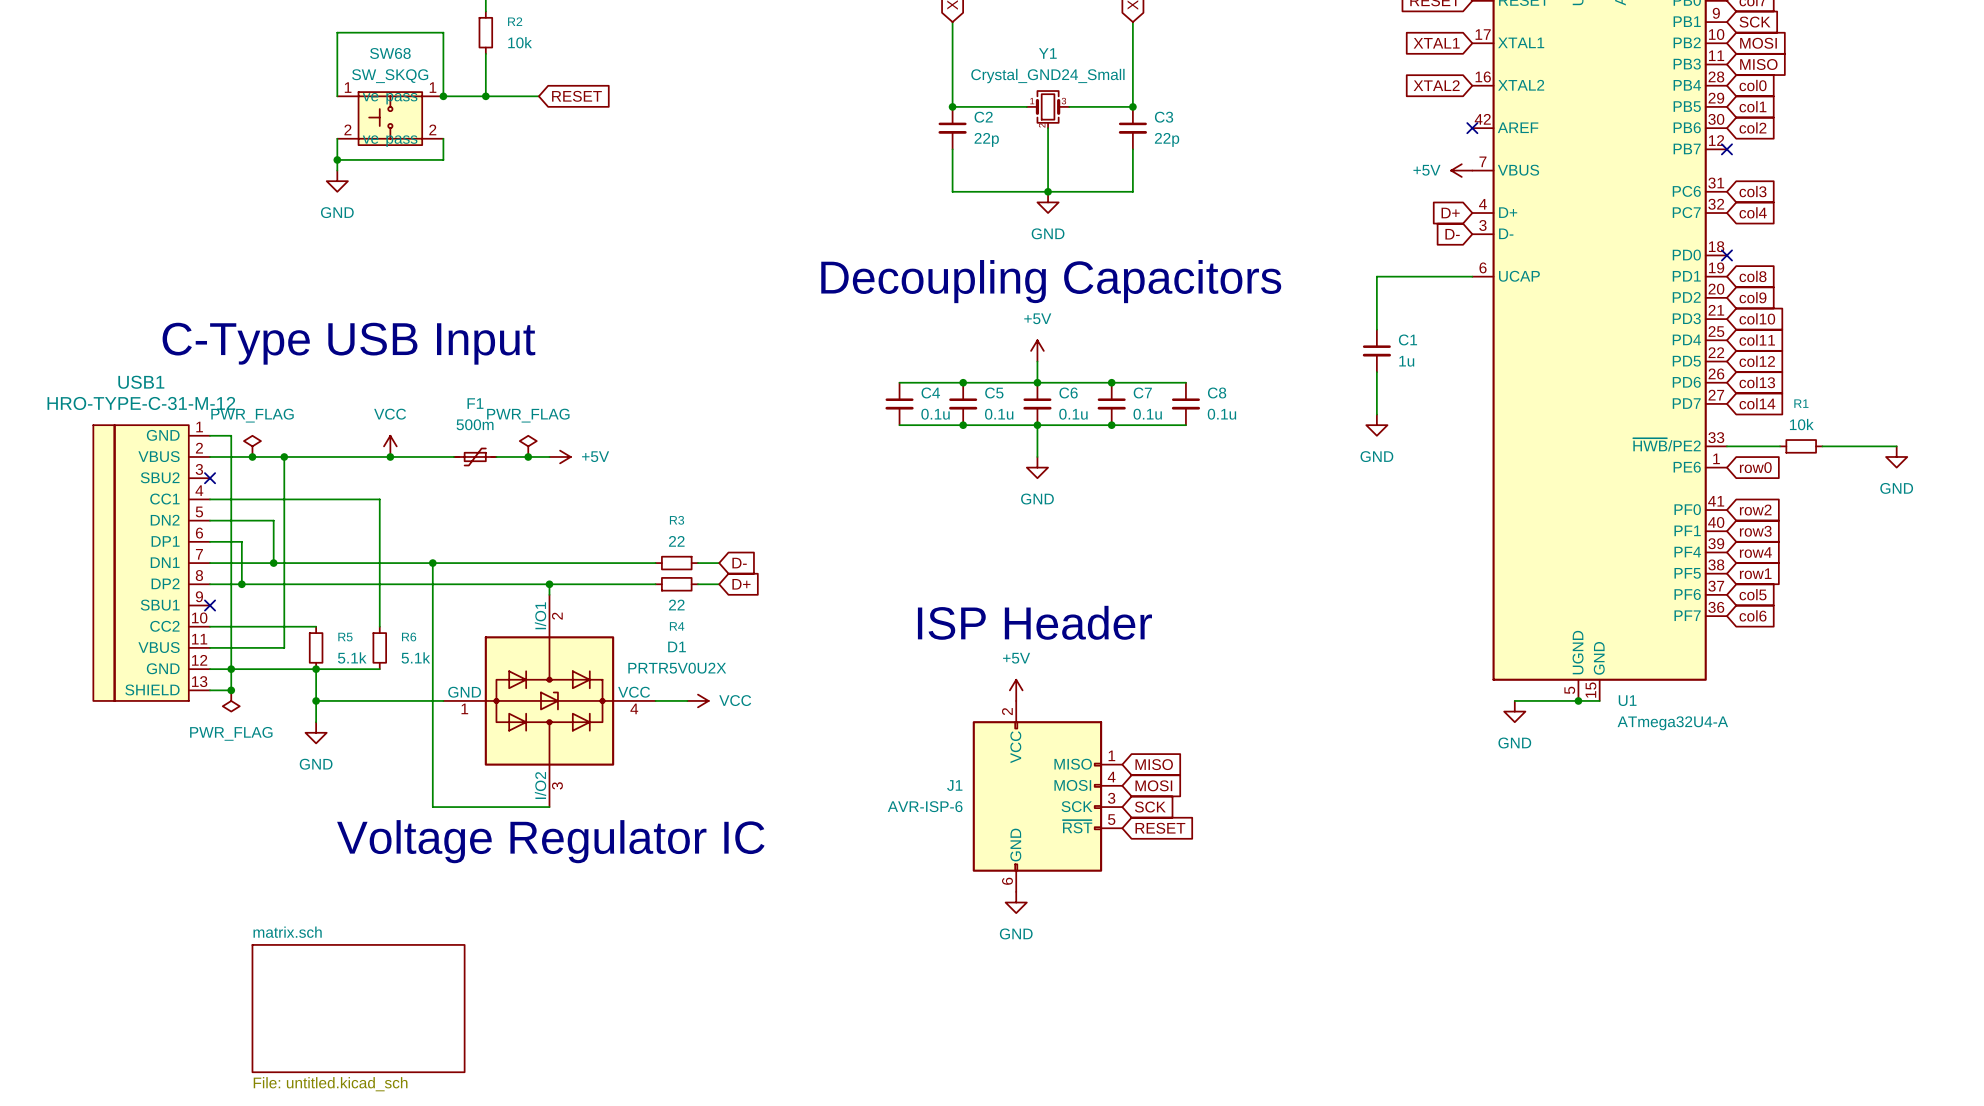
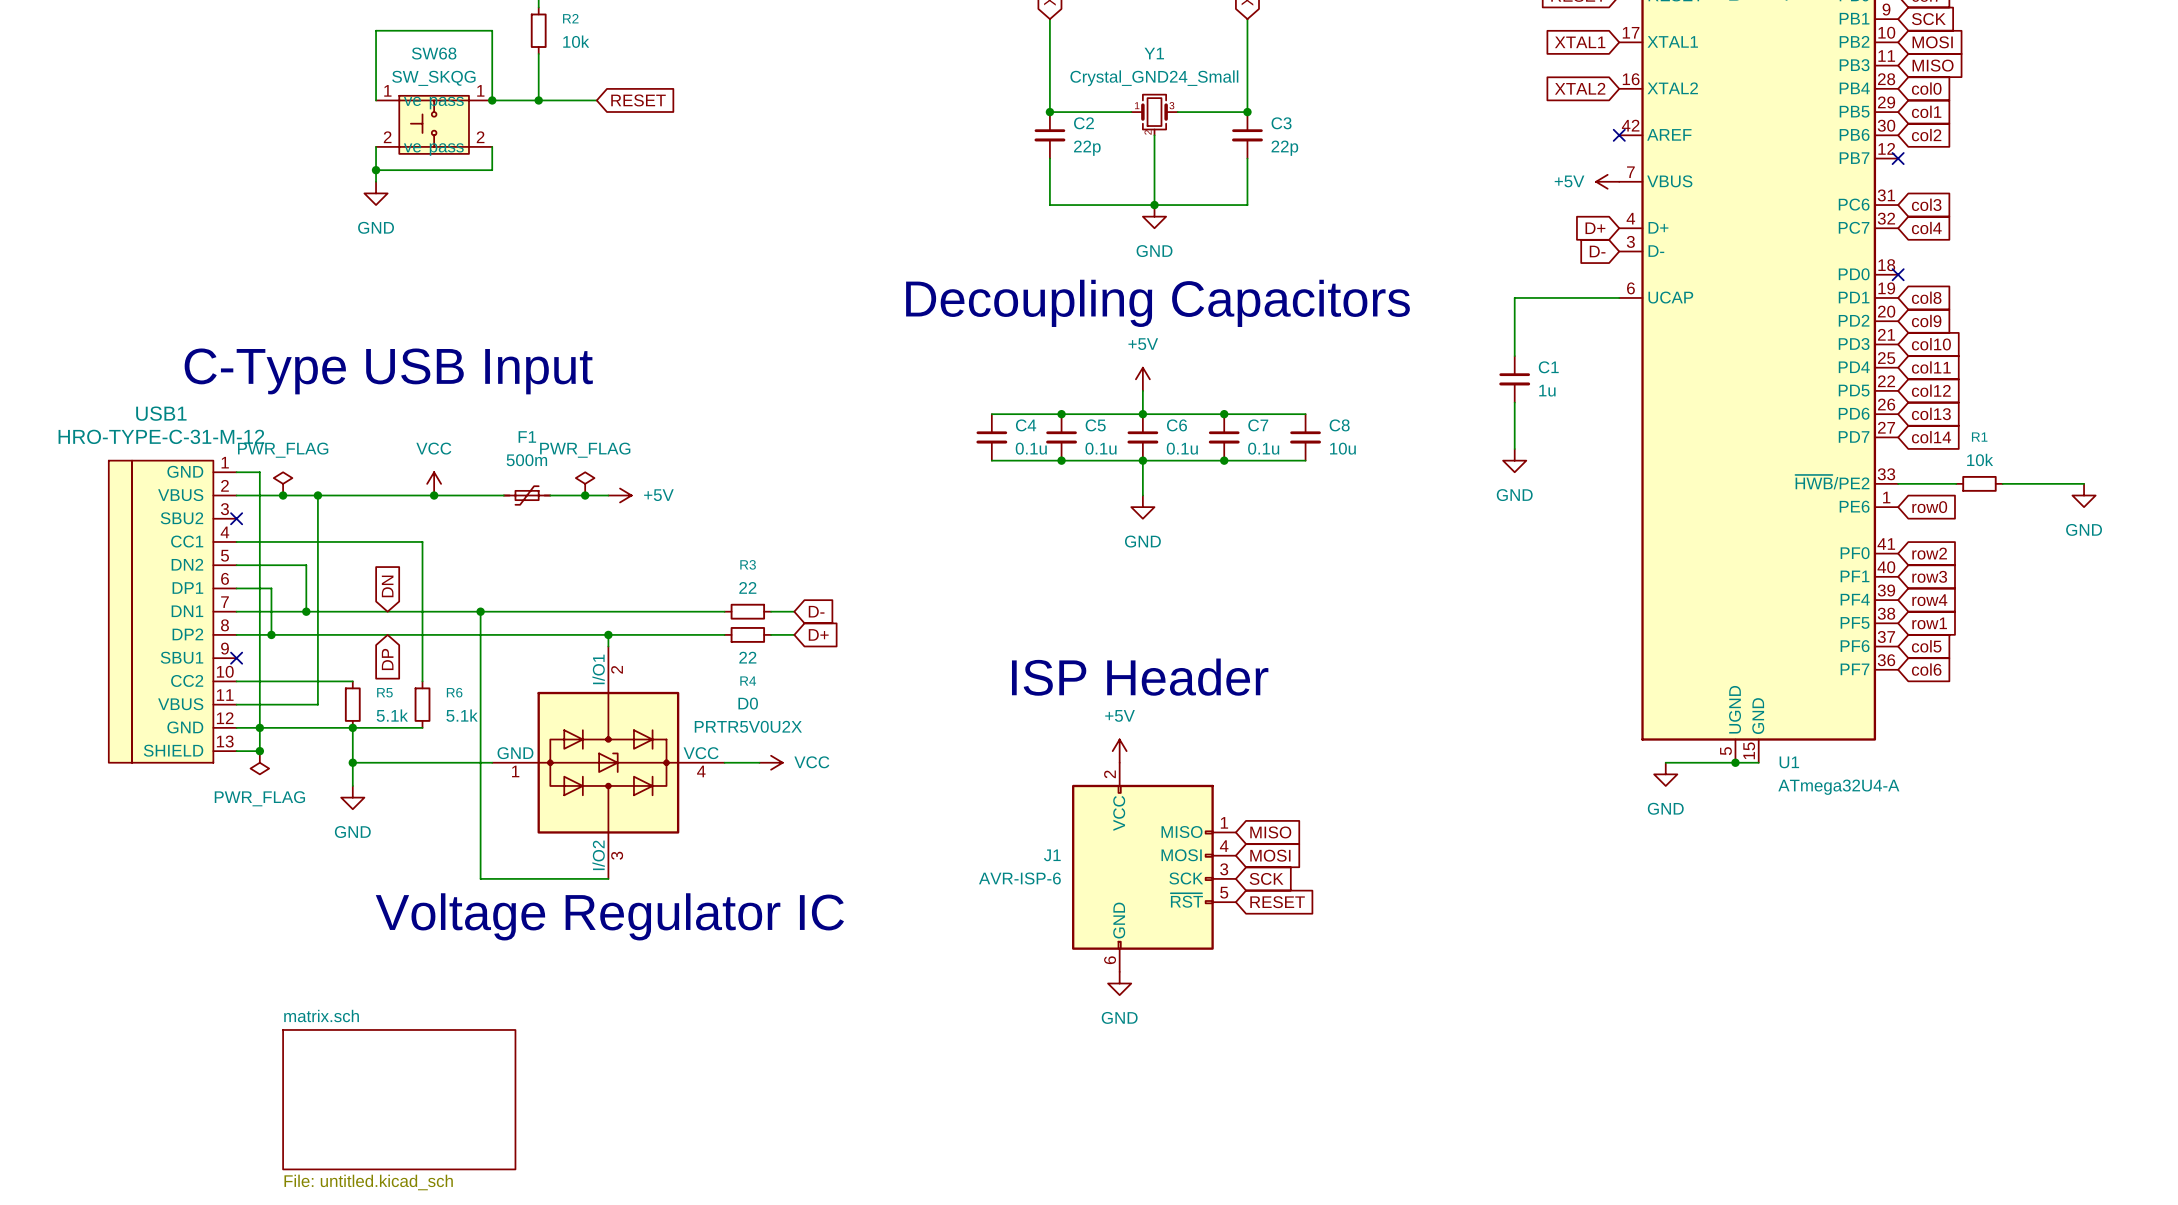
C8 value: 0.1u (1221, 414) -> 10u (1342, 448)
global label: none -> DN (387, 586)
global label: none -> DP (387, 659)
D1 name: D1 (677, 646) -> D0 (748, 703)

